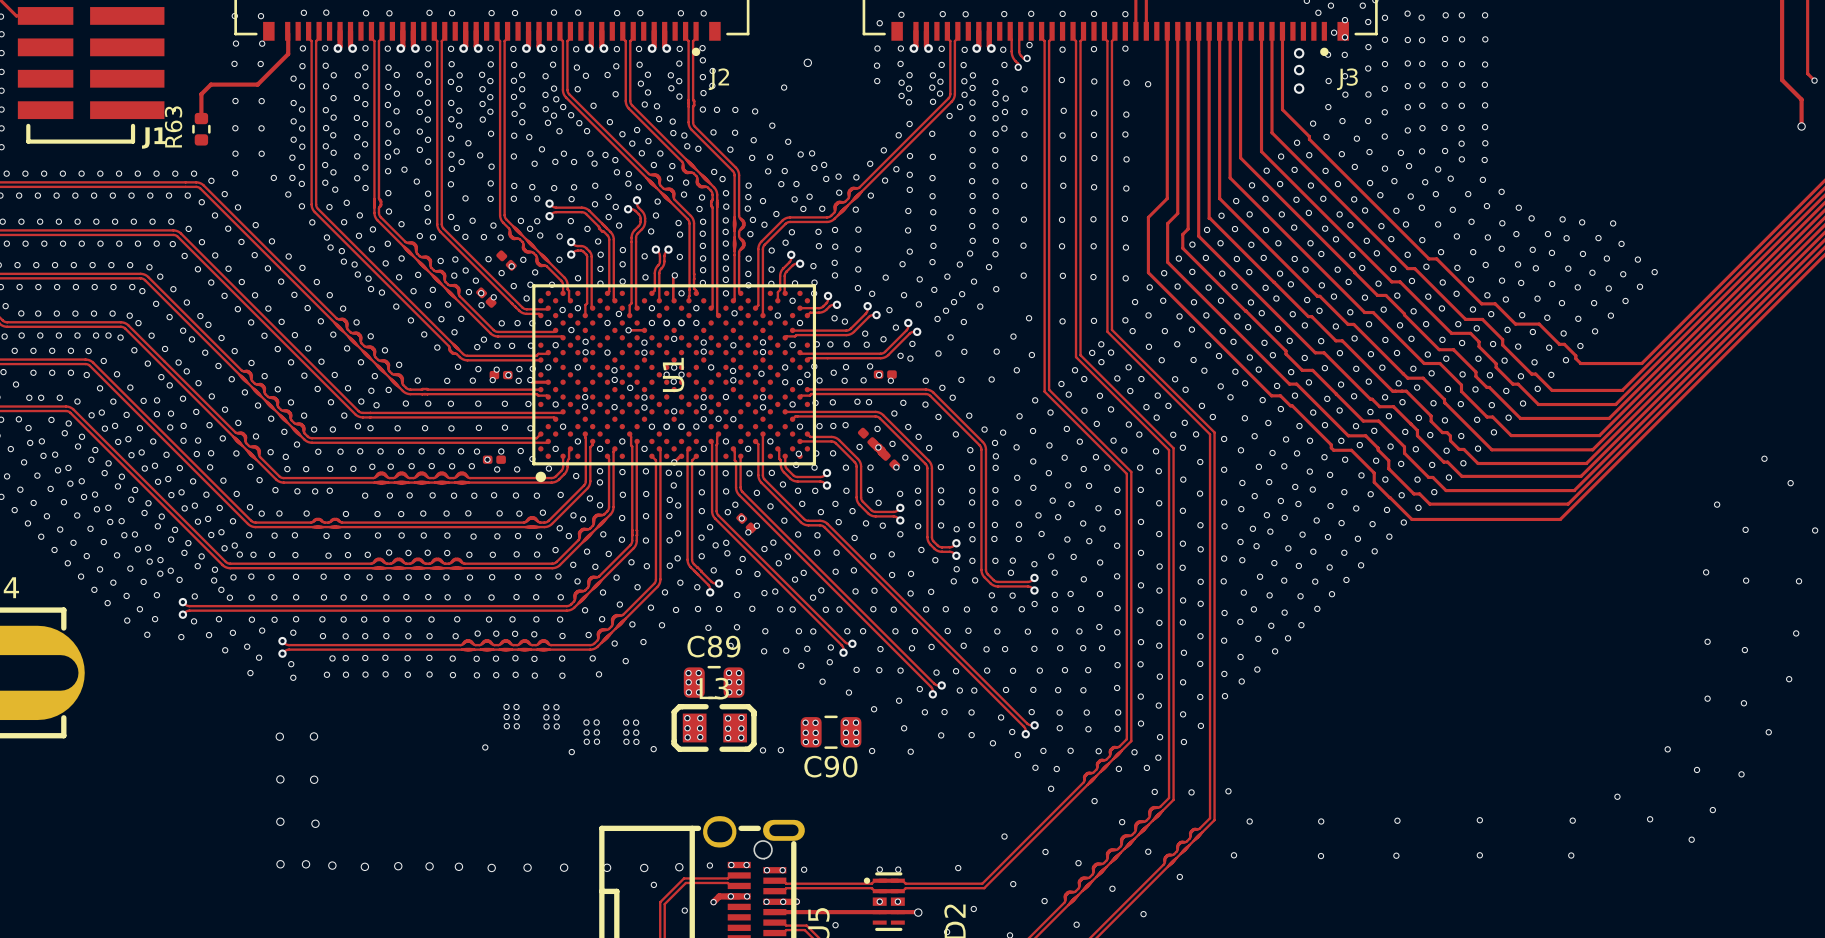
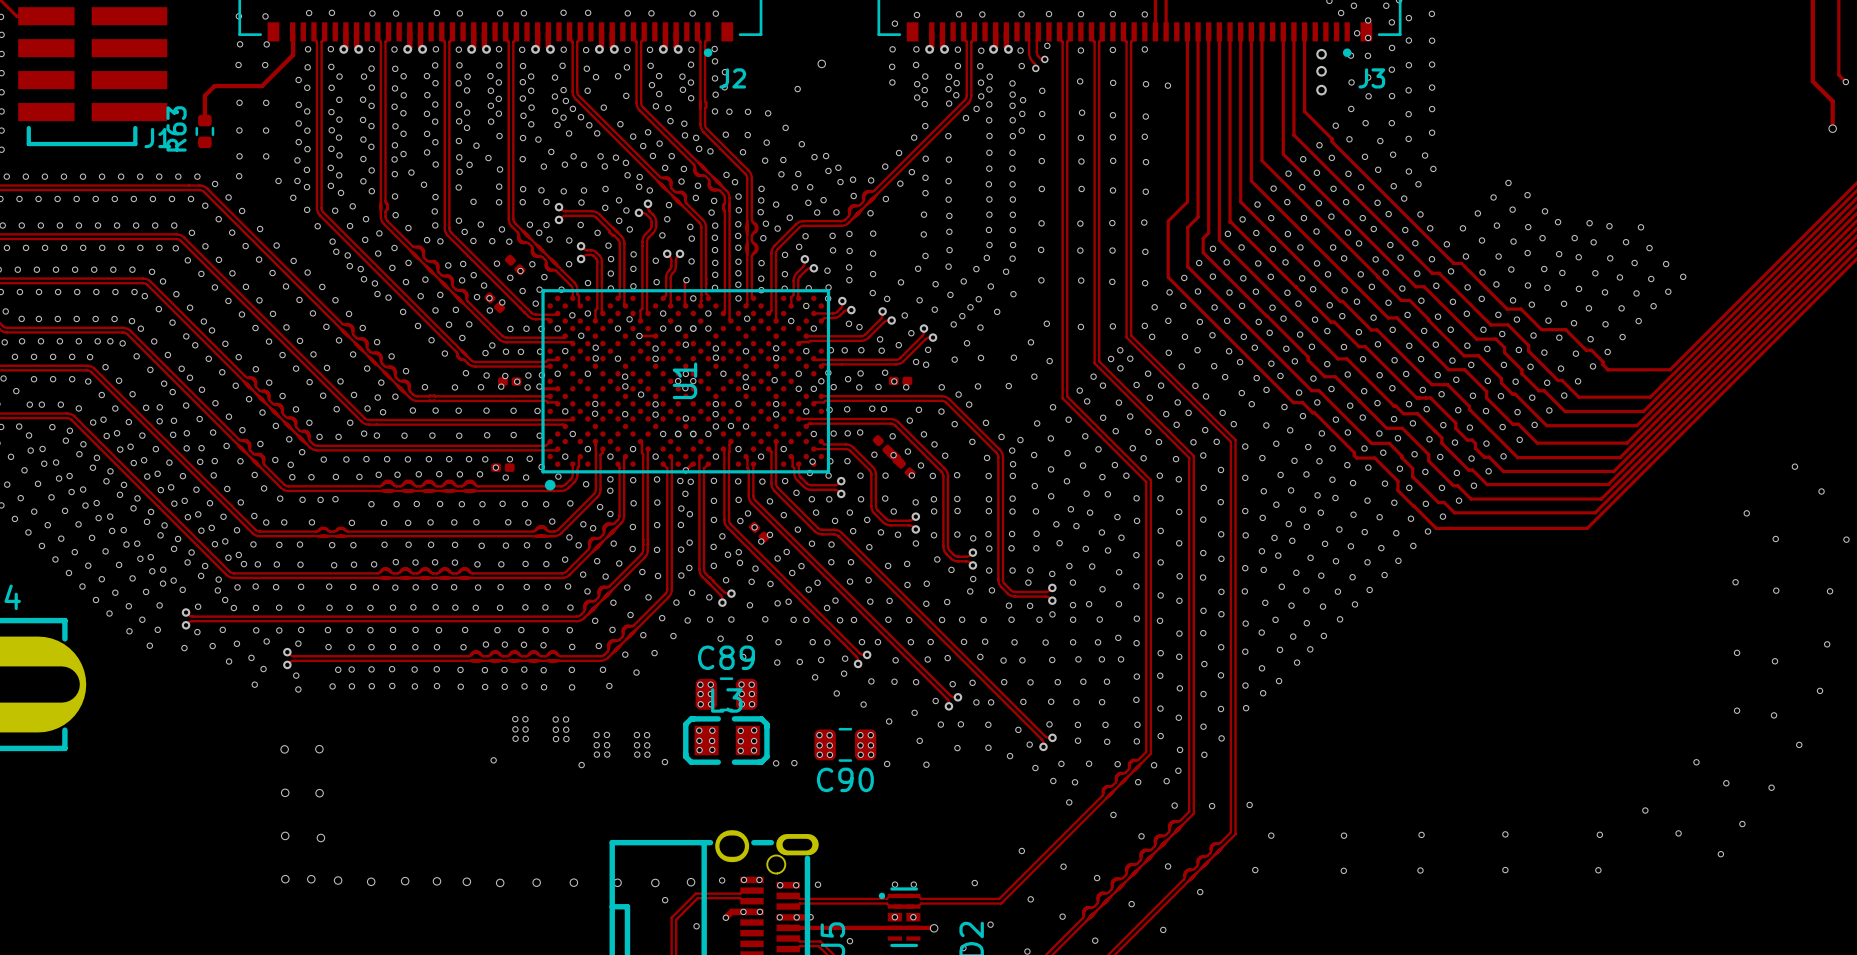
via: (1445, 15) -> none
via: (1461, 15) -> none
via: (1485, 15) -> none
via: (1421, 17) -> none
via: (1445, 38) -> none
via: (1462, 39) -> none
via: (1485, 39) -> none
via: (1422, 40) -> none
via: (1422, 63) -> none
via: (1444, 64) -> none
via: (1462, 64) -> none
via: (1485, 64) -> none
via: (1444, 84) -> none
via: (1462, 84) -> none
via: (1484, 84) -> none
via: (1422, 85) -> none
via: (1422, 105) -> none
via: (1444, 105) -> none
via: (1461, 105) -> none
via: (1485, 105) -> none
via: (1444, 127) -> none
via: (1461, 127) -> none
via: (1485, 127) -> none
via: (1422, 128) -> none
via: (1461, 143) -> none
via: (1485, 143) -> none
via: (1422, 151) -> none
via: (1445, 151) -> none
via: (1461, 159) -> none
via: (1484, 160) -> none
via: (1438, 169) -> none
via: (1450, 178) -> none
via: (1425, 182) -> none
via: (1435, 194) -> none
via: (1410, 196) -> none
via: (1421, 207) -> none

